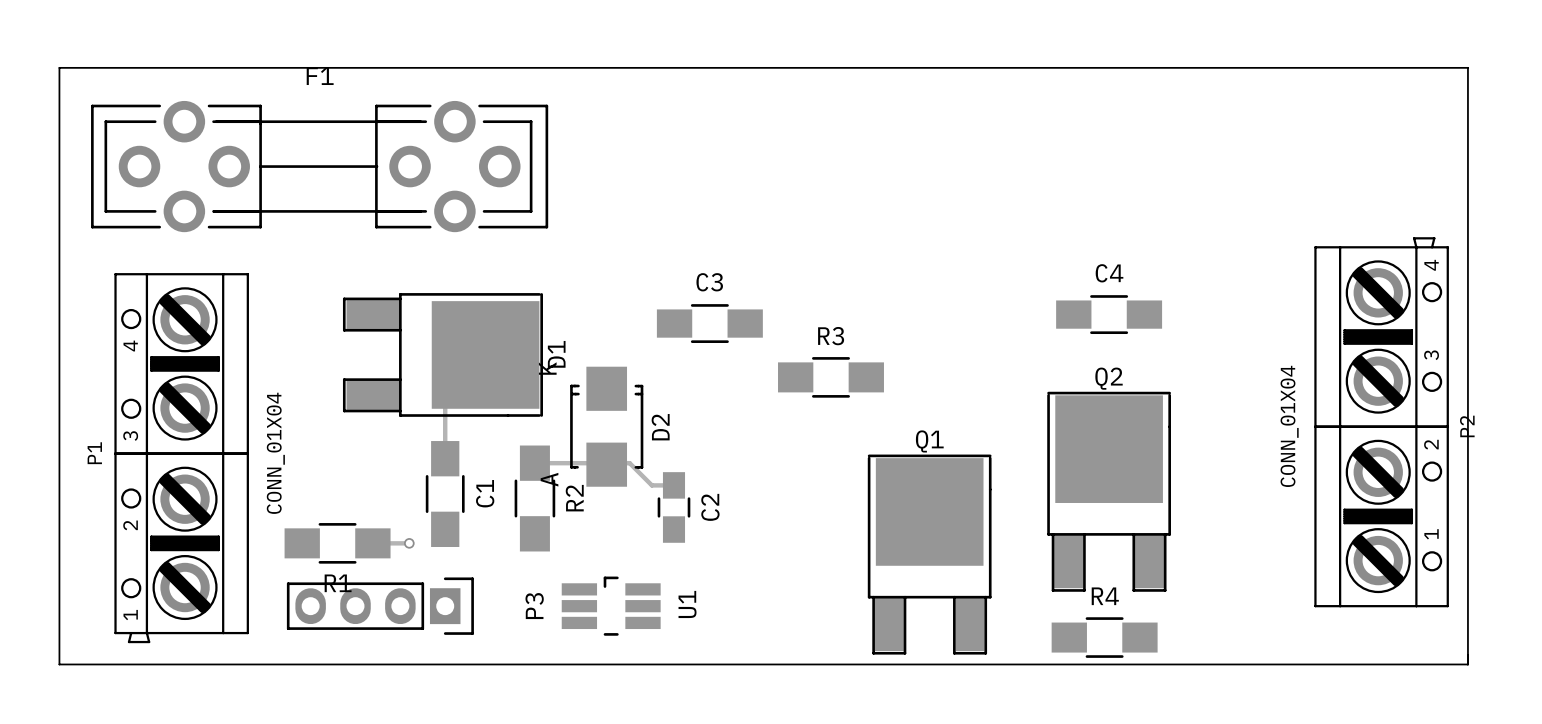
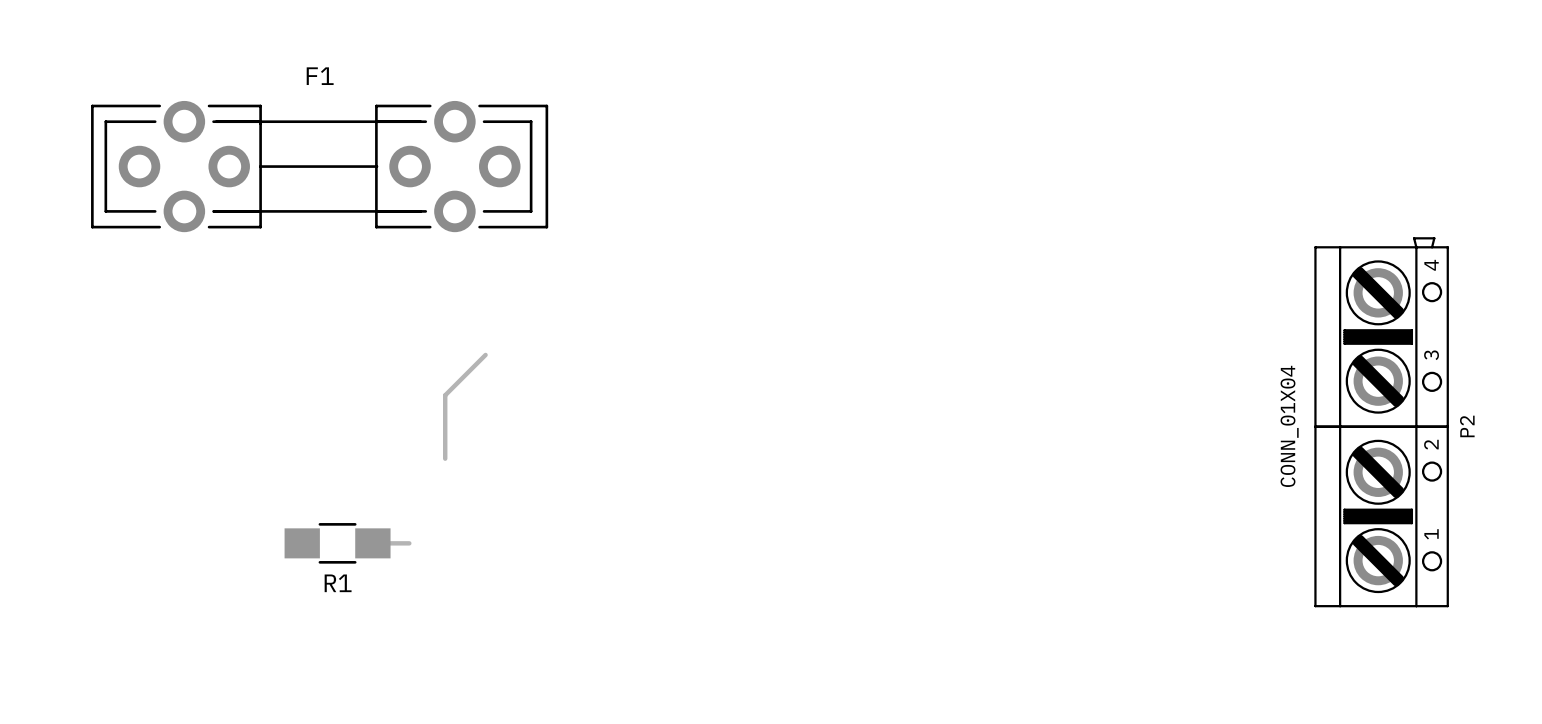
board edge: (59, 67) (59, 664) (1467, 664) (1467, 67) (59, 67) -> none
C4: (1109, 314) -> none
C3: (709, 323) -> none
D1: (442, 354) -> none
R3: (830, 377) -> none
D2: (606, 426) -> none
P1: CONN_01X04 (181, 458) -> none
track: (534, 463) (629, 463) (651, 485) (673, 485) -> none
Q2: (1109, 491) -> none
C1: (445, 494) -> none
R2: (534, 498) -> none
C2: (673, 507) -> none
via: (409, 543) -> none
Q1: (929, 554) -> none
P3: (380, 606) -> none
U1: (611, 606) -> none
R4: (1104, 637) -> none

